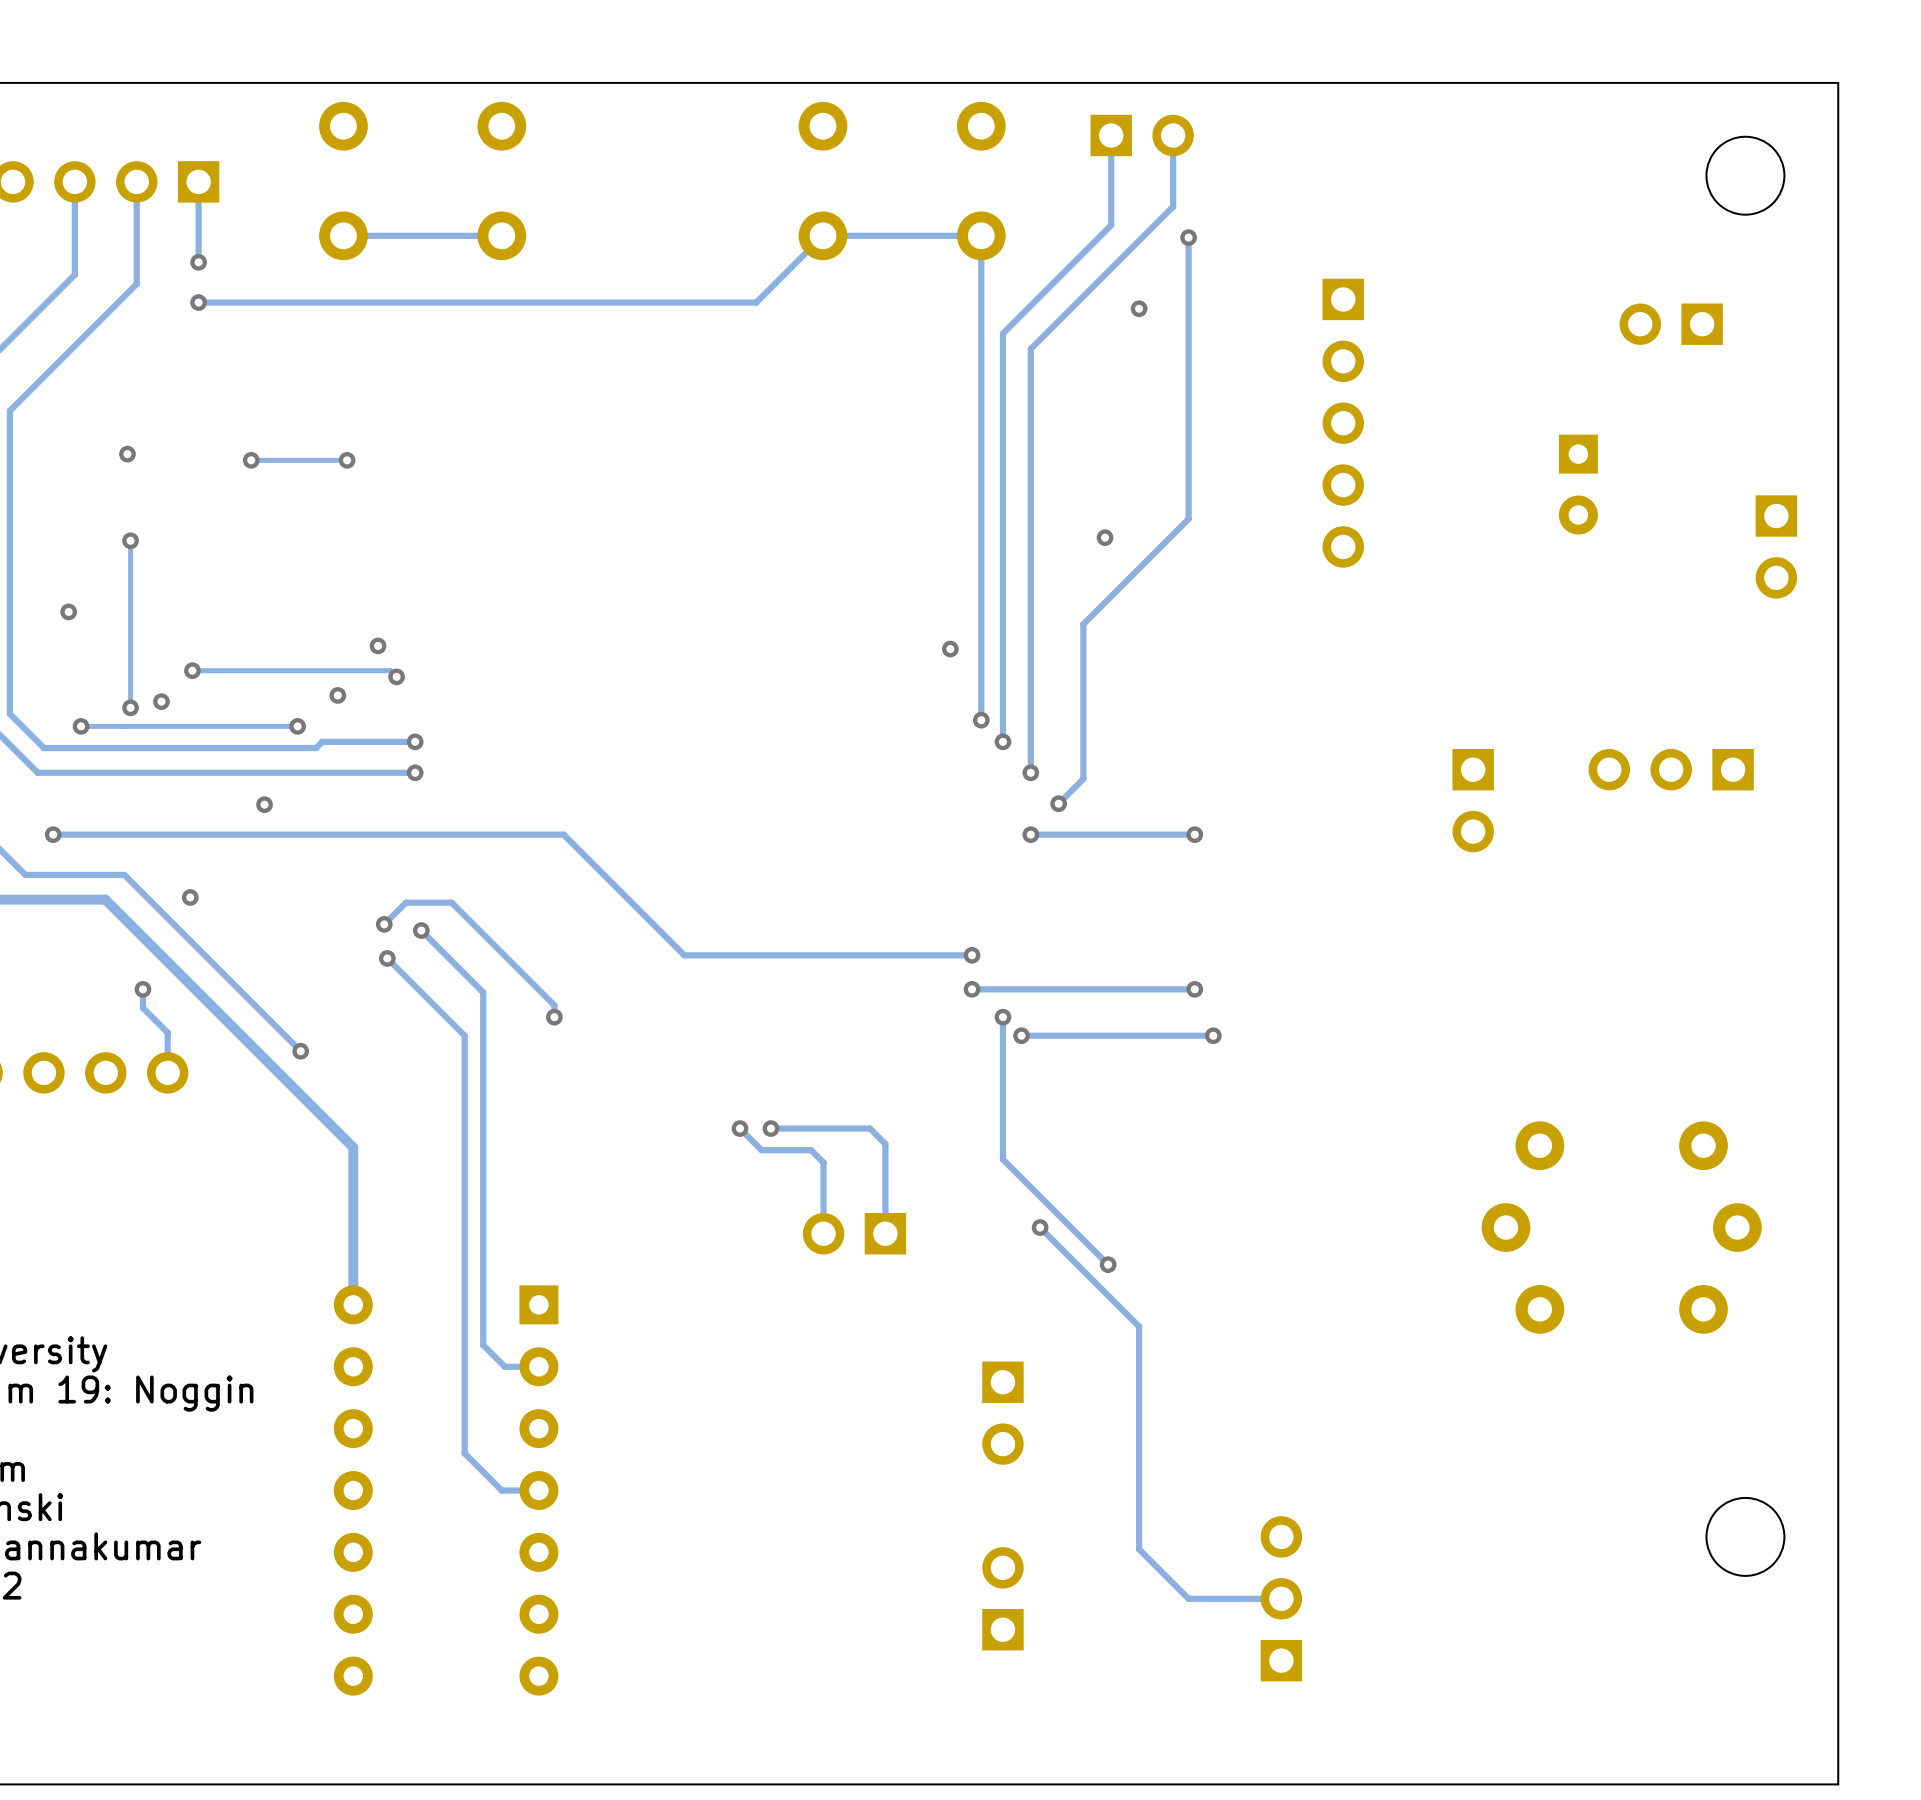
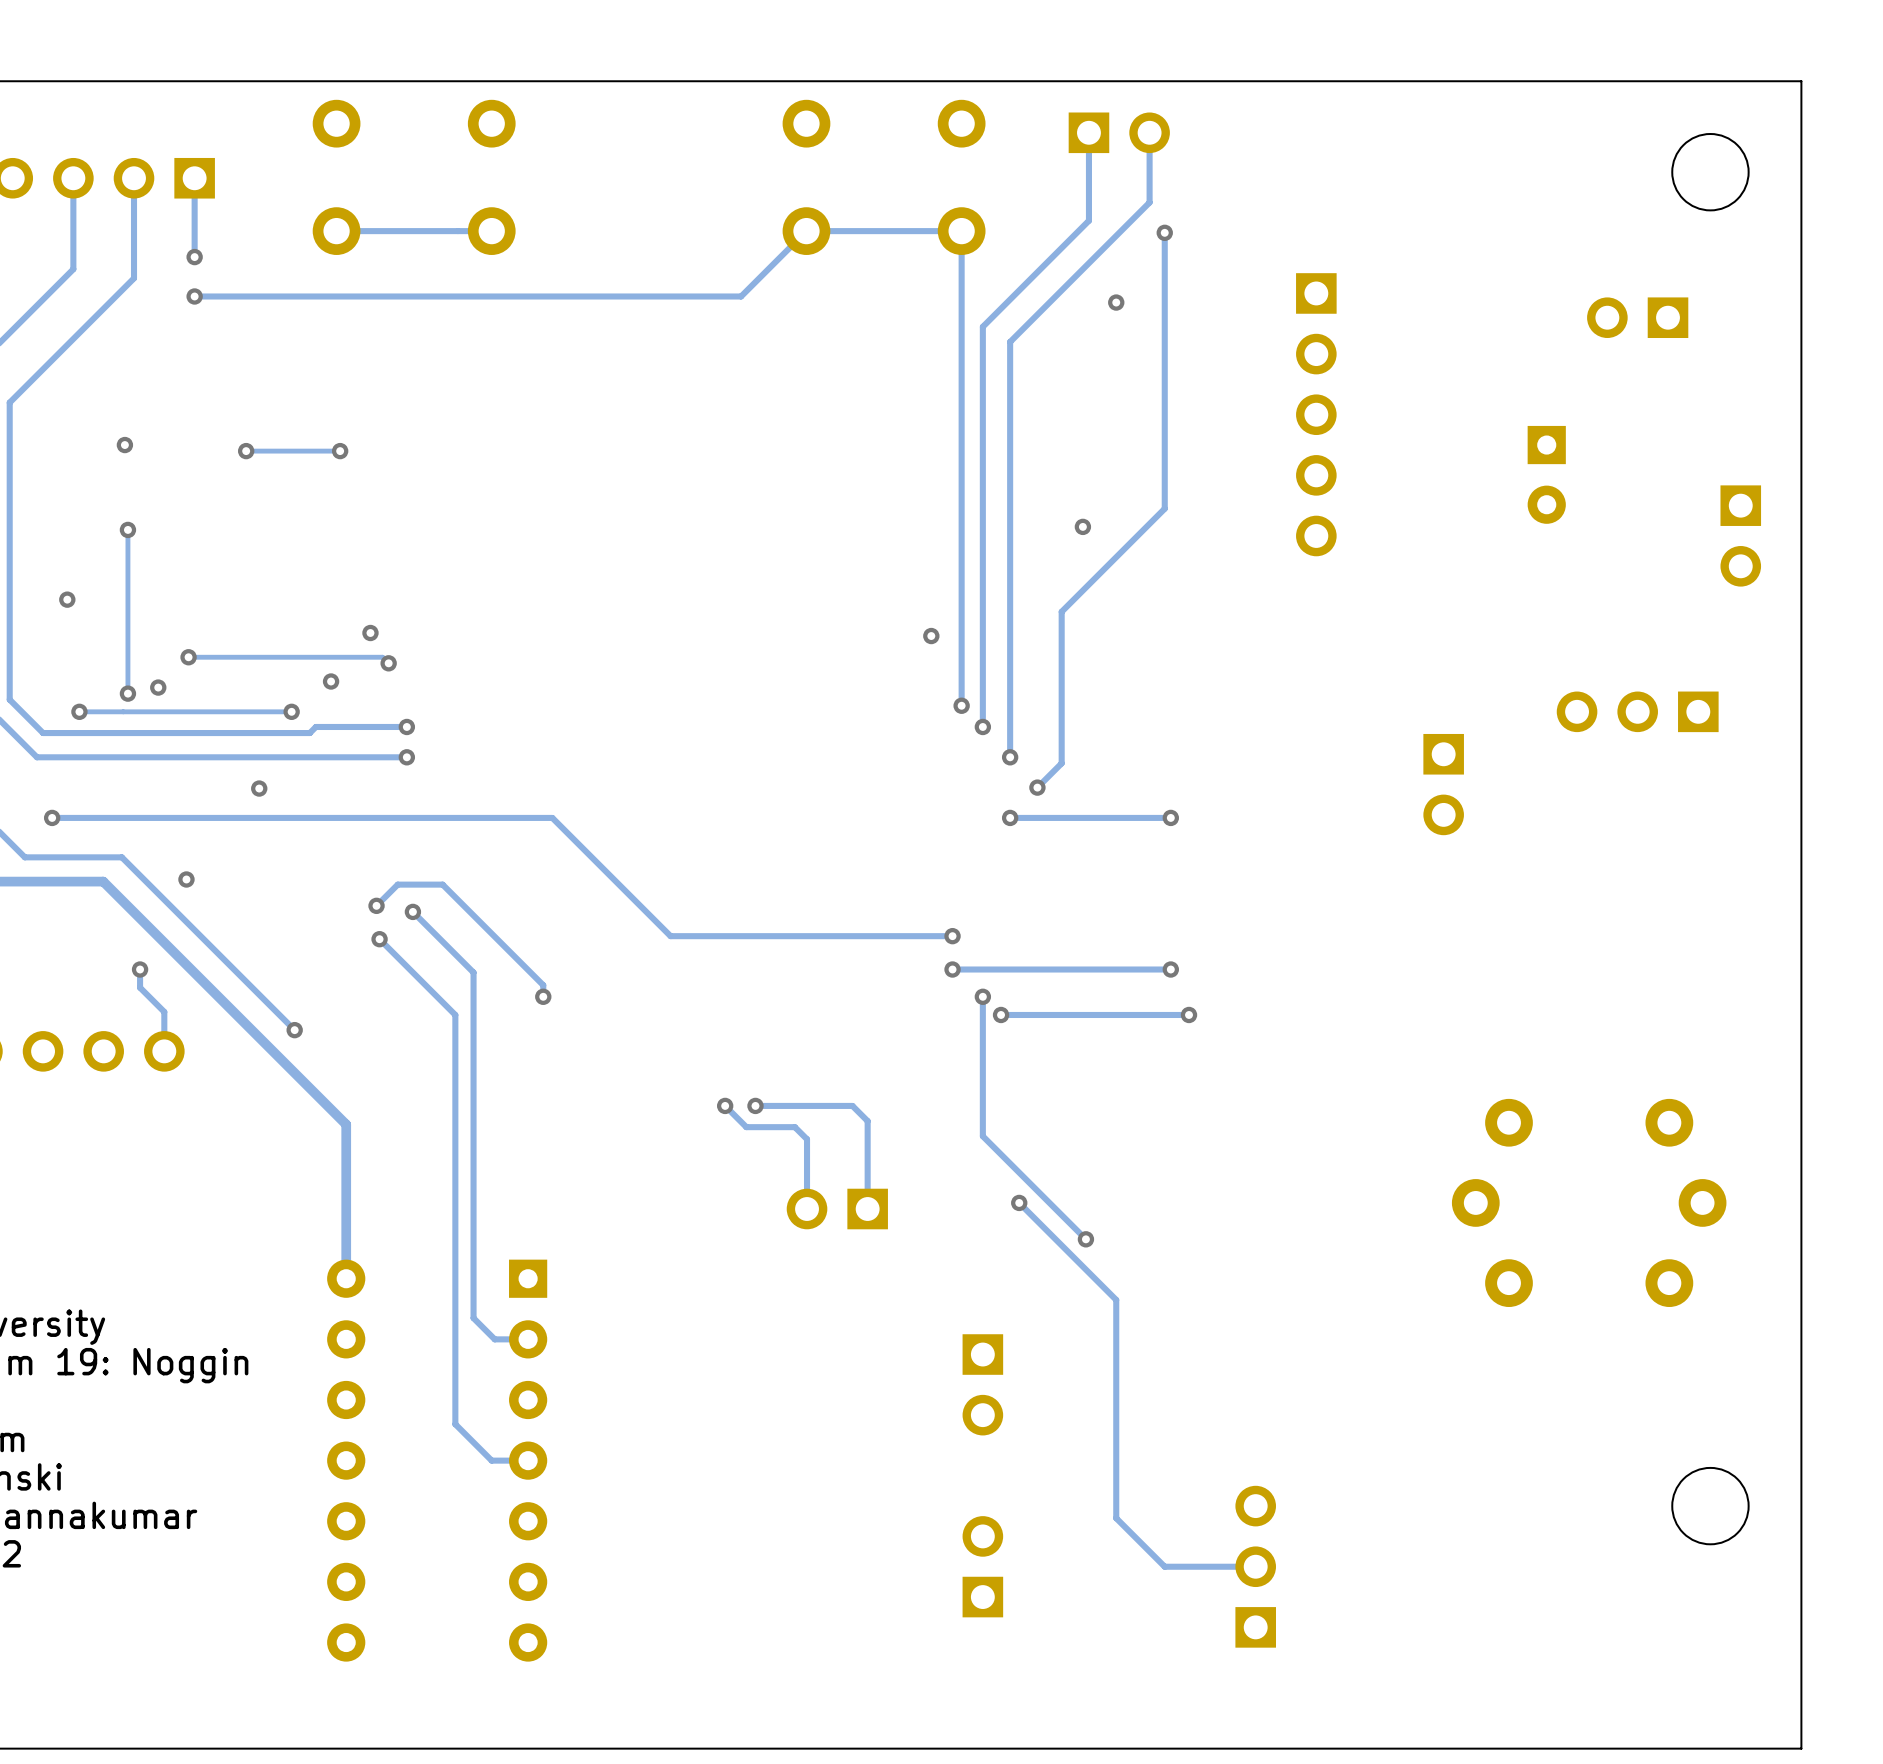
part position: (1671, 769) -> (1637, 711)

